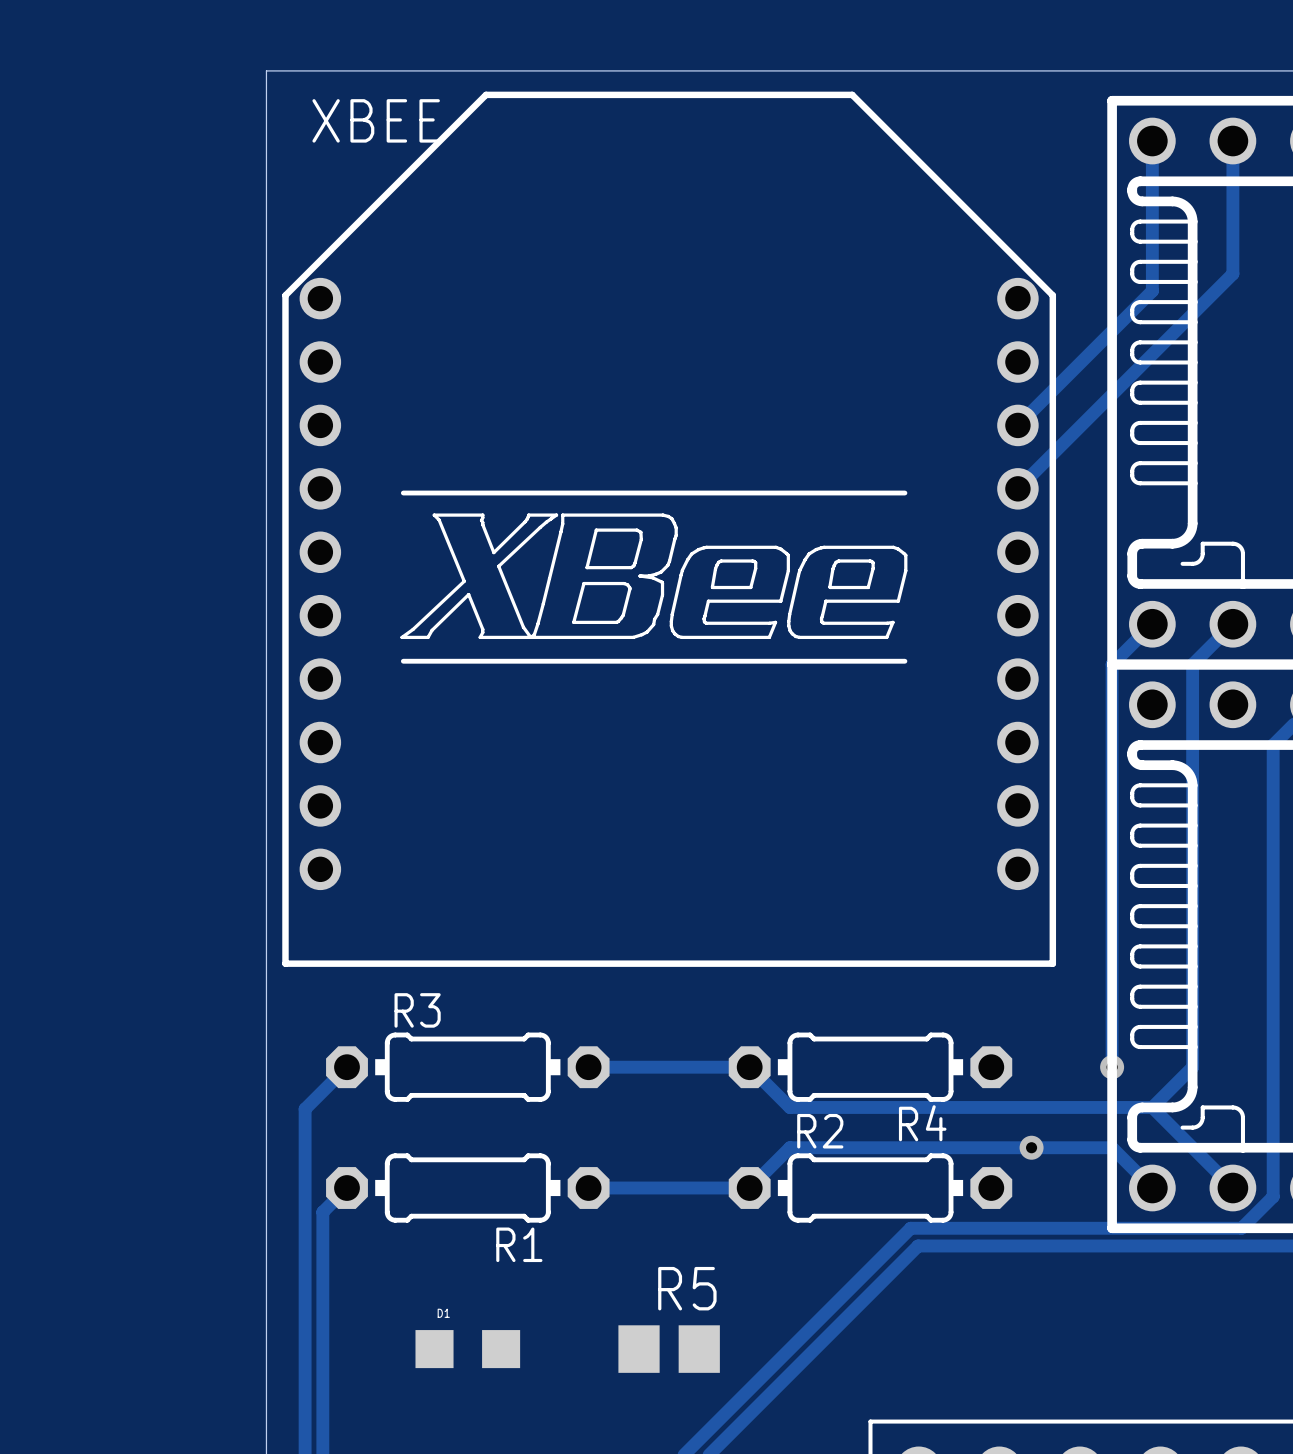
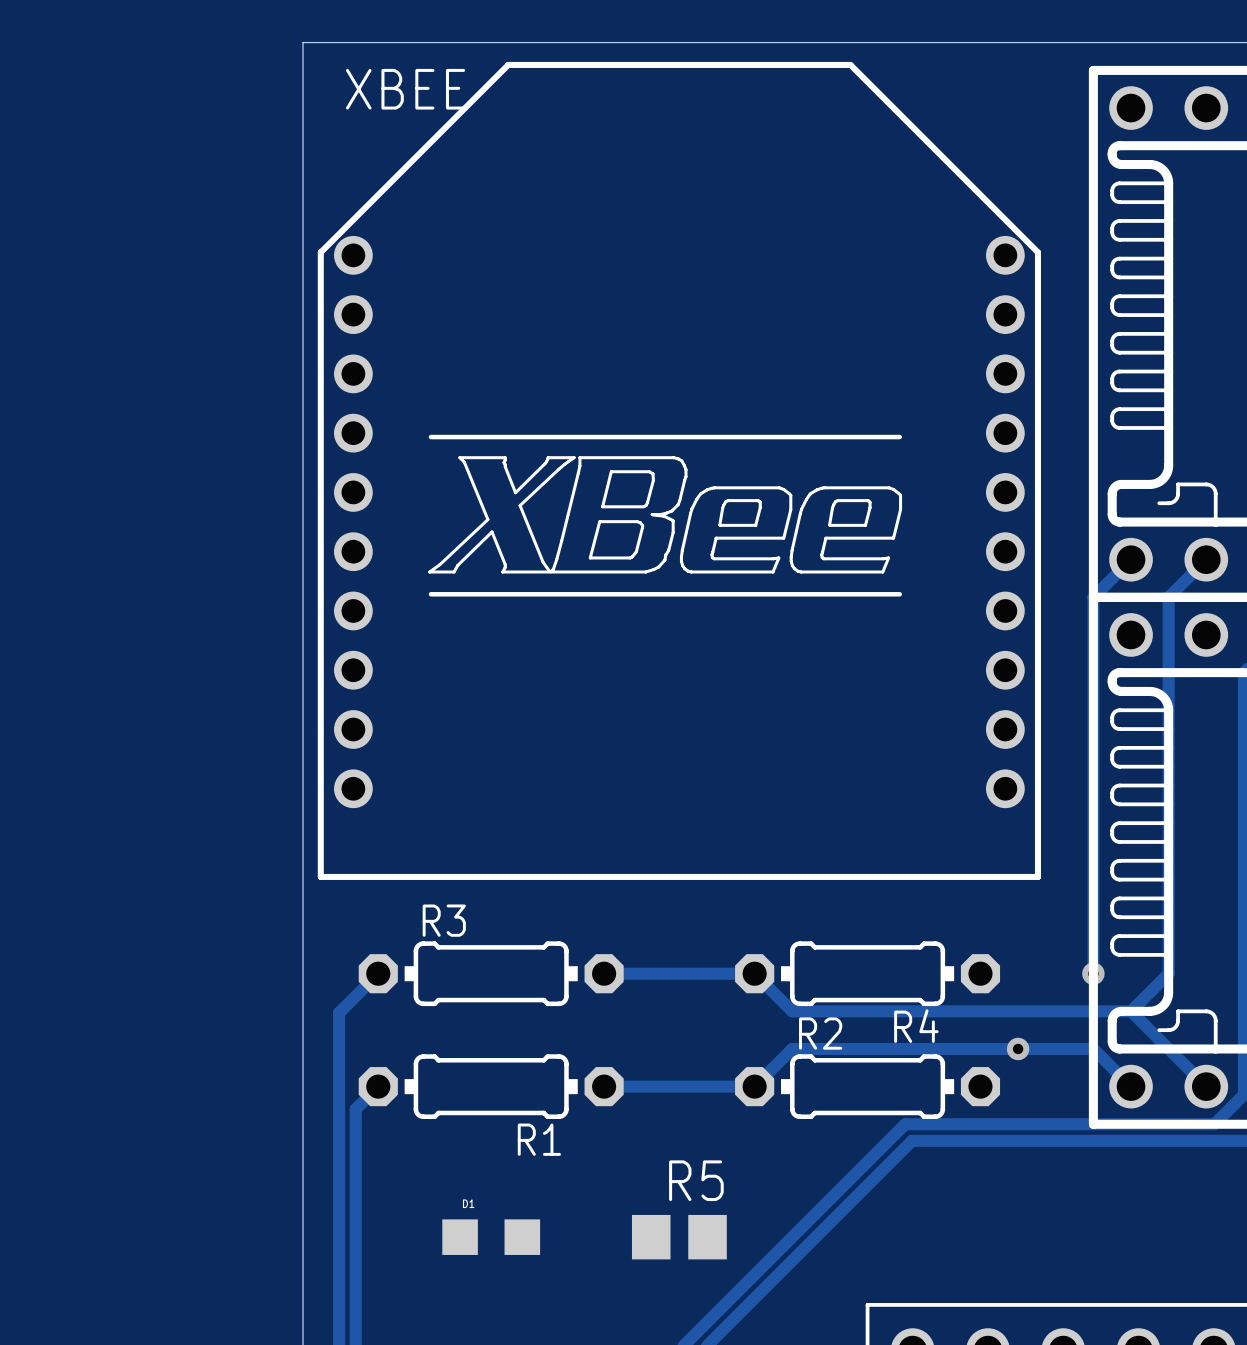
track: (1152, 141) (1152, 290) (1017, 425) -> none
track: (1232, 141) (1232, 273) (1017, 488) -> none

